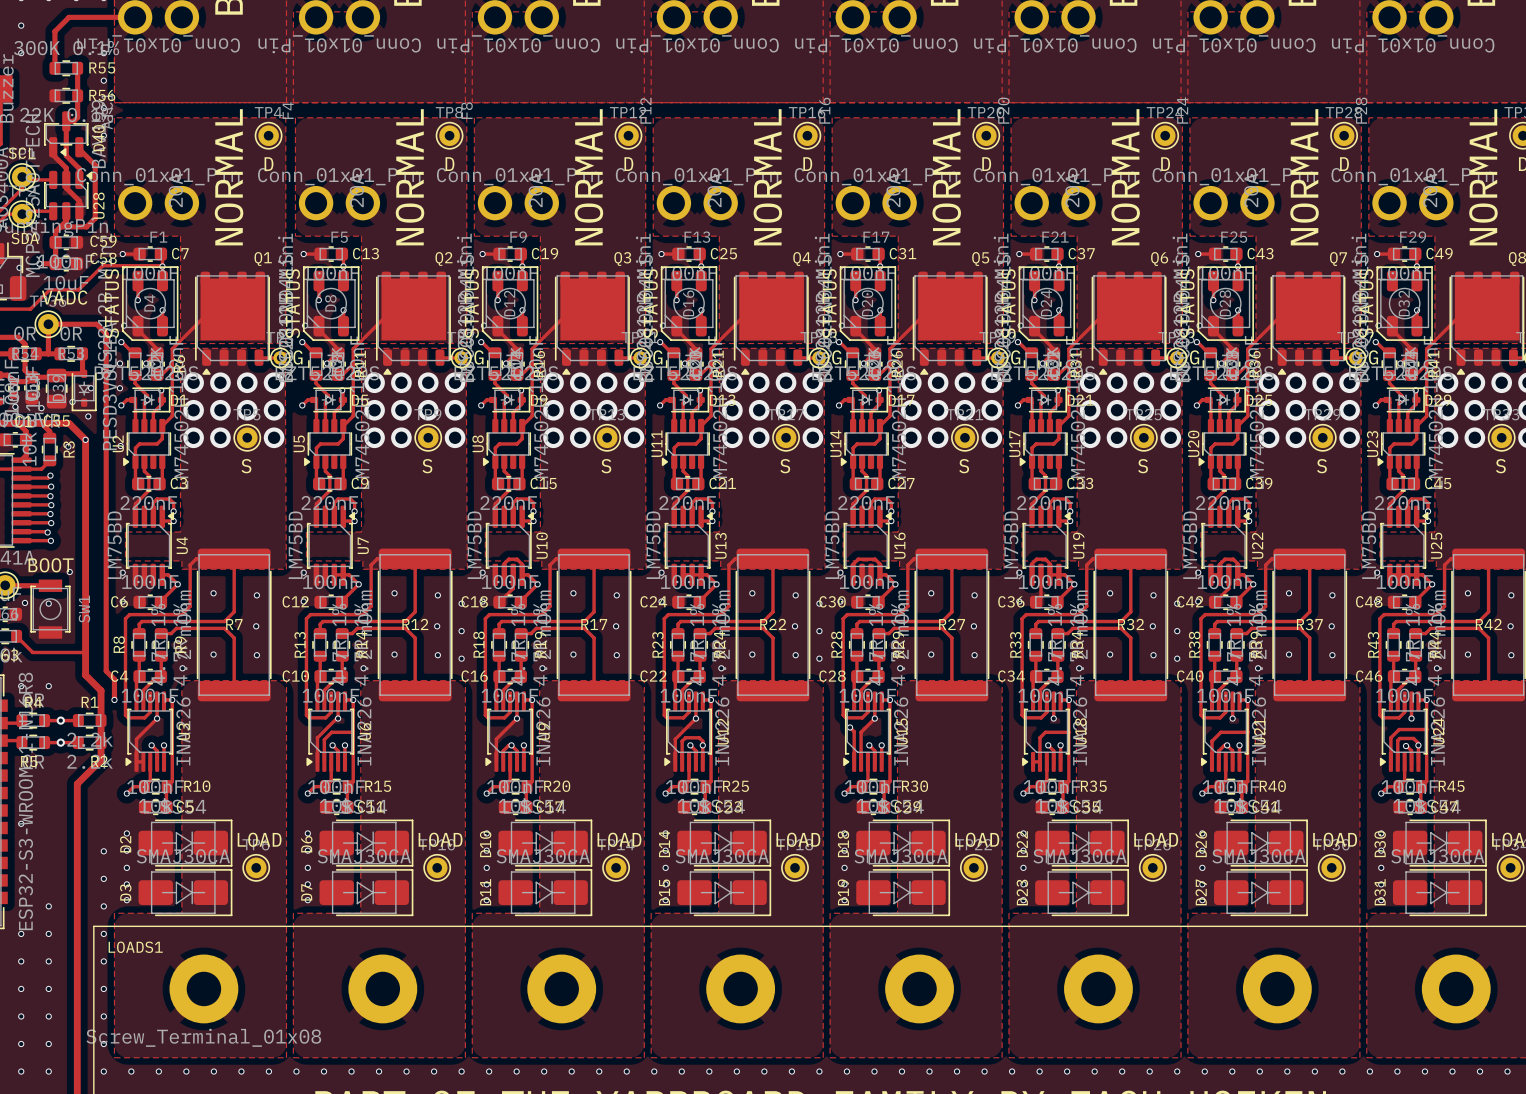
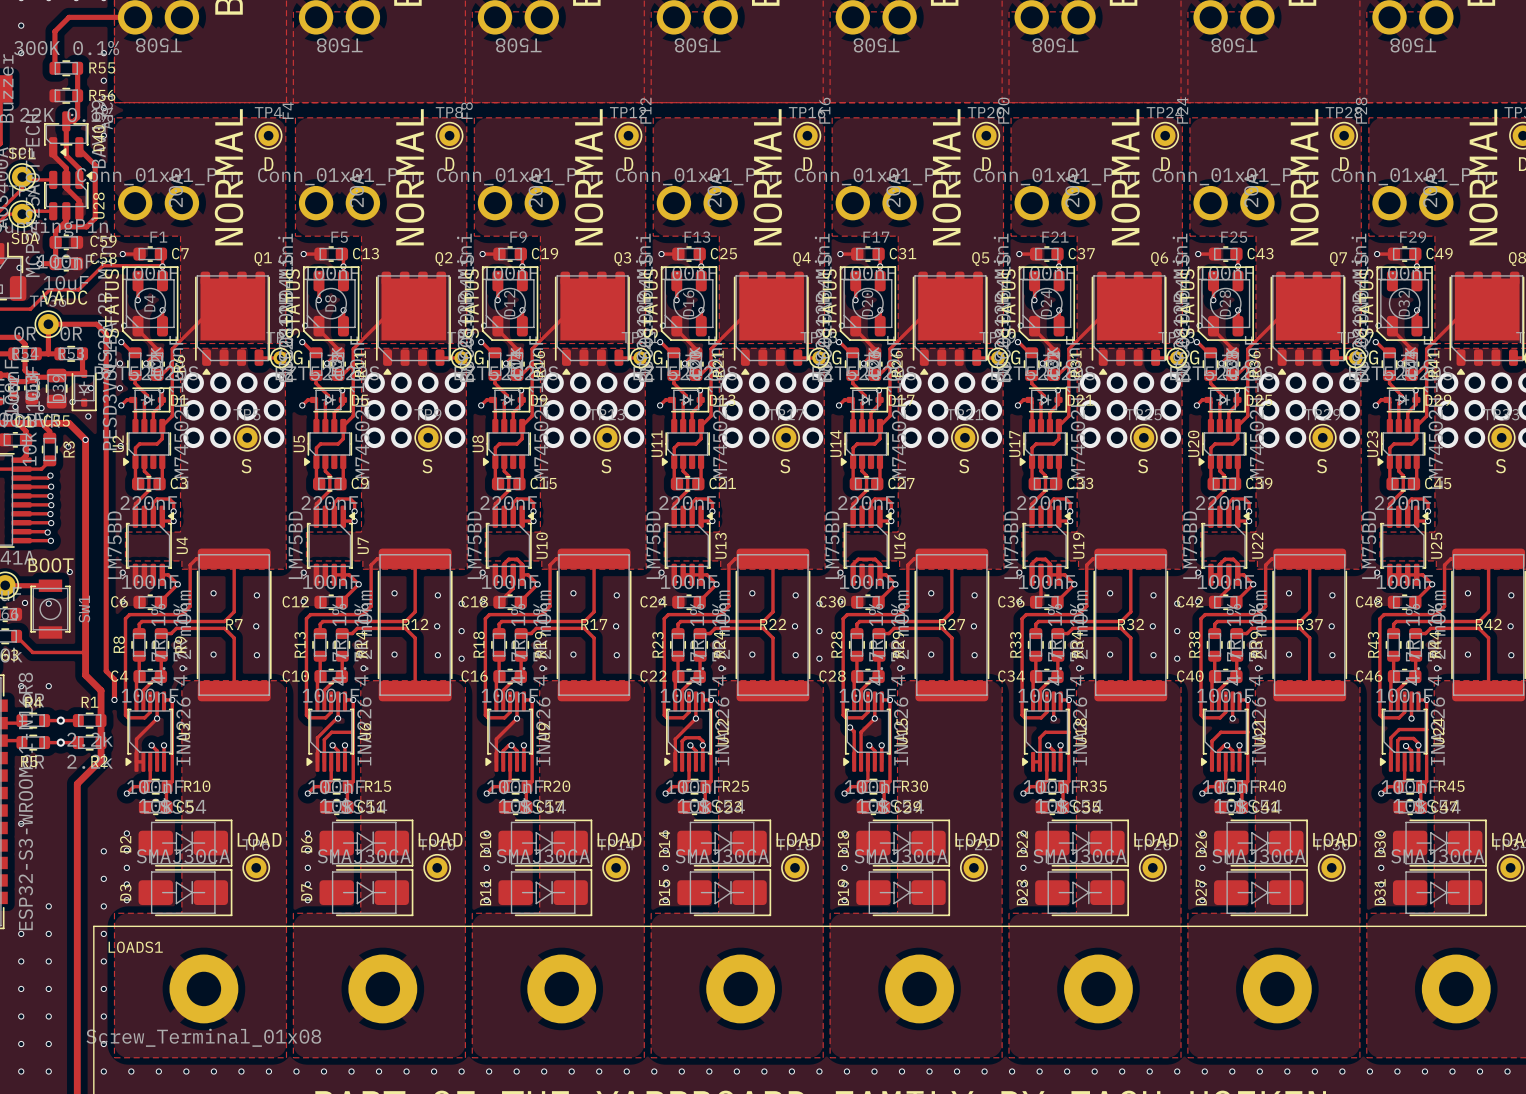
part value: Conn_01x01_Pin (158, 44) -> T508 (158, 45)
part value: Conn_01x01_Pin (339, 44) -> T508 (339, 45)
part value: Conn_01x01_Pin (518, 44) -> T508 (518, 45)
part value: Conn_01x01_Pin (697, 44) -> T508 (697, 45)
part value: Conn_01x01_Pin (876, 44) -> T508 (876, 45)
part value: Conn_01x01_Pin (1055, 44) -> T508 (1055, 45)
part value: Conn_01x01_Pin (1234, 44) -> T508 (1234, 45)
part value: Conn_01x01_Pin (1413, 44) -> T508 (1413, 45)

